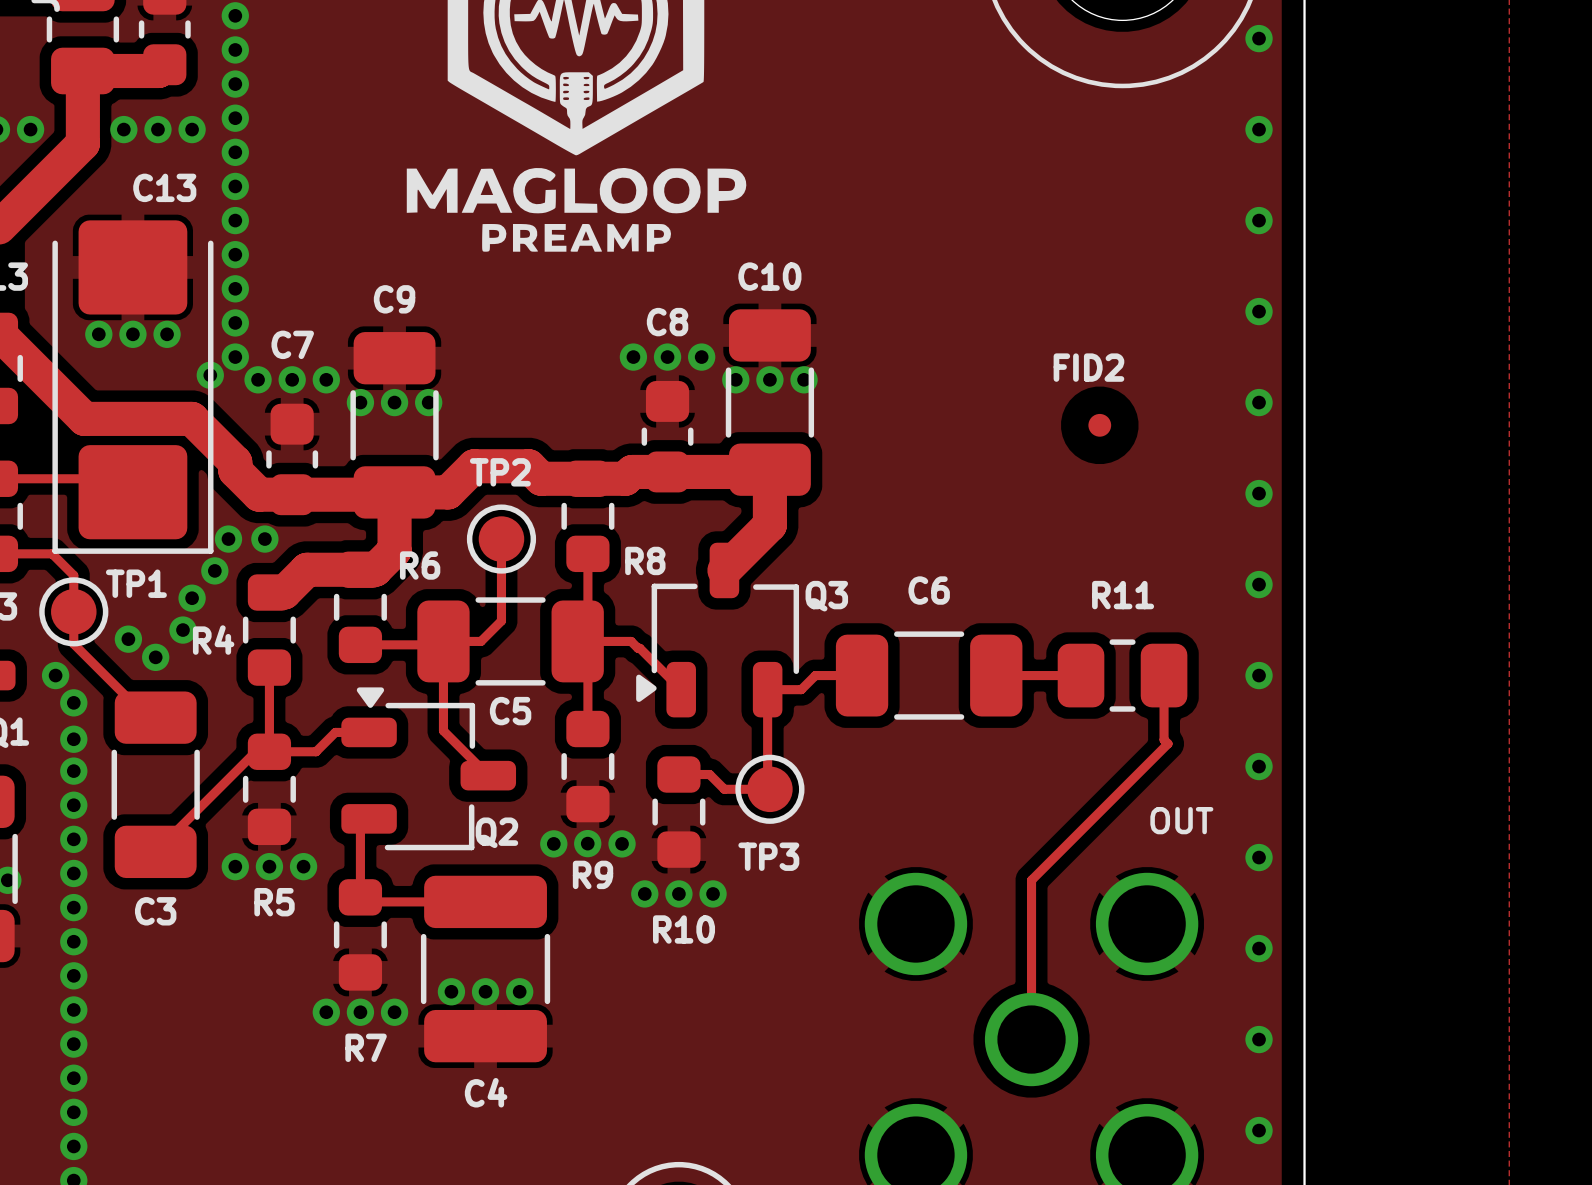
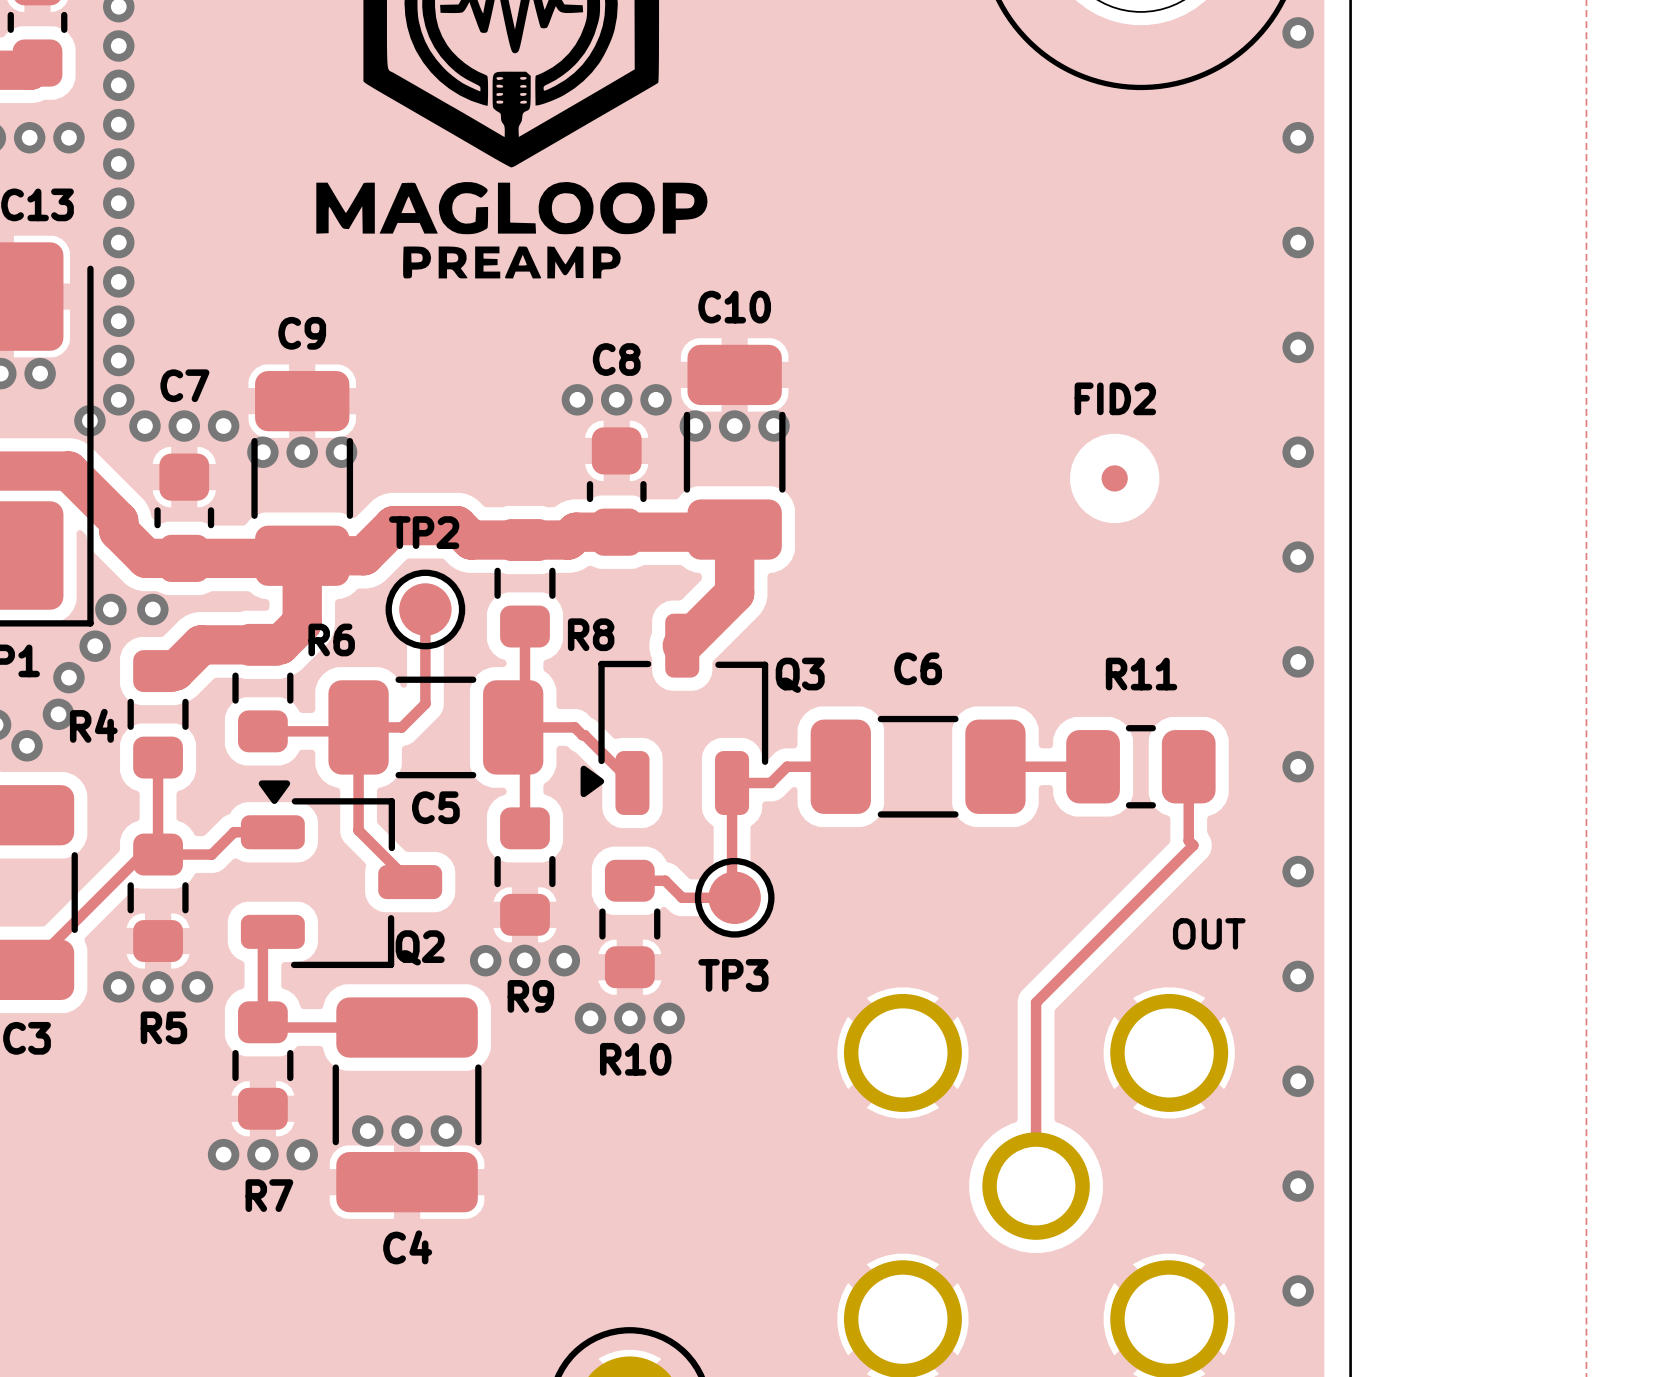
FID2 name position: FID2 (1088, 367) -> FID2 (1115, 398)

